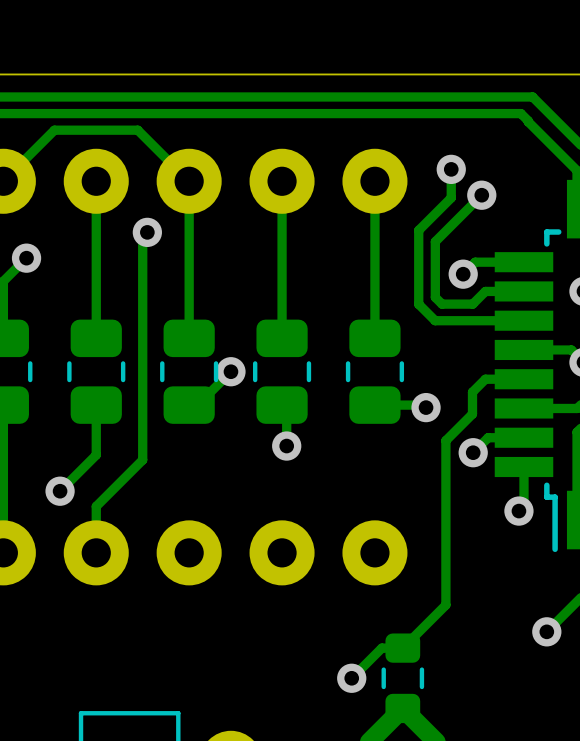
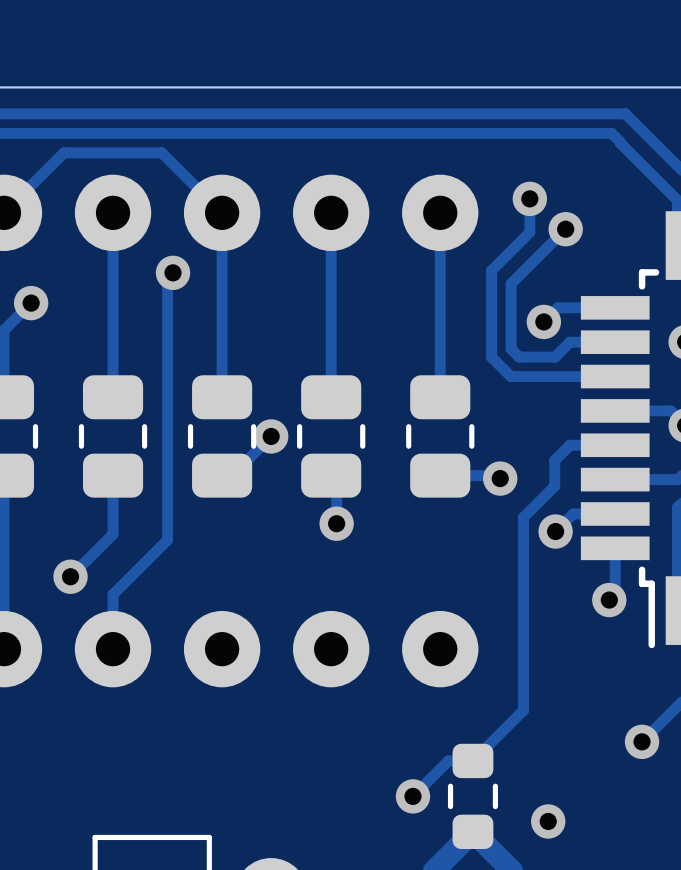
via: none -> (548, 821)

